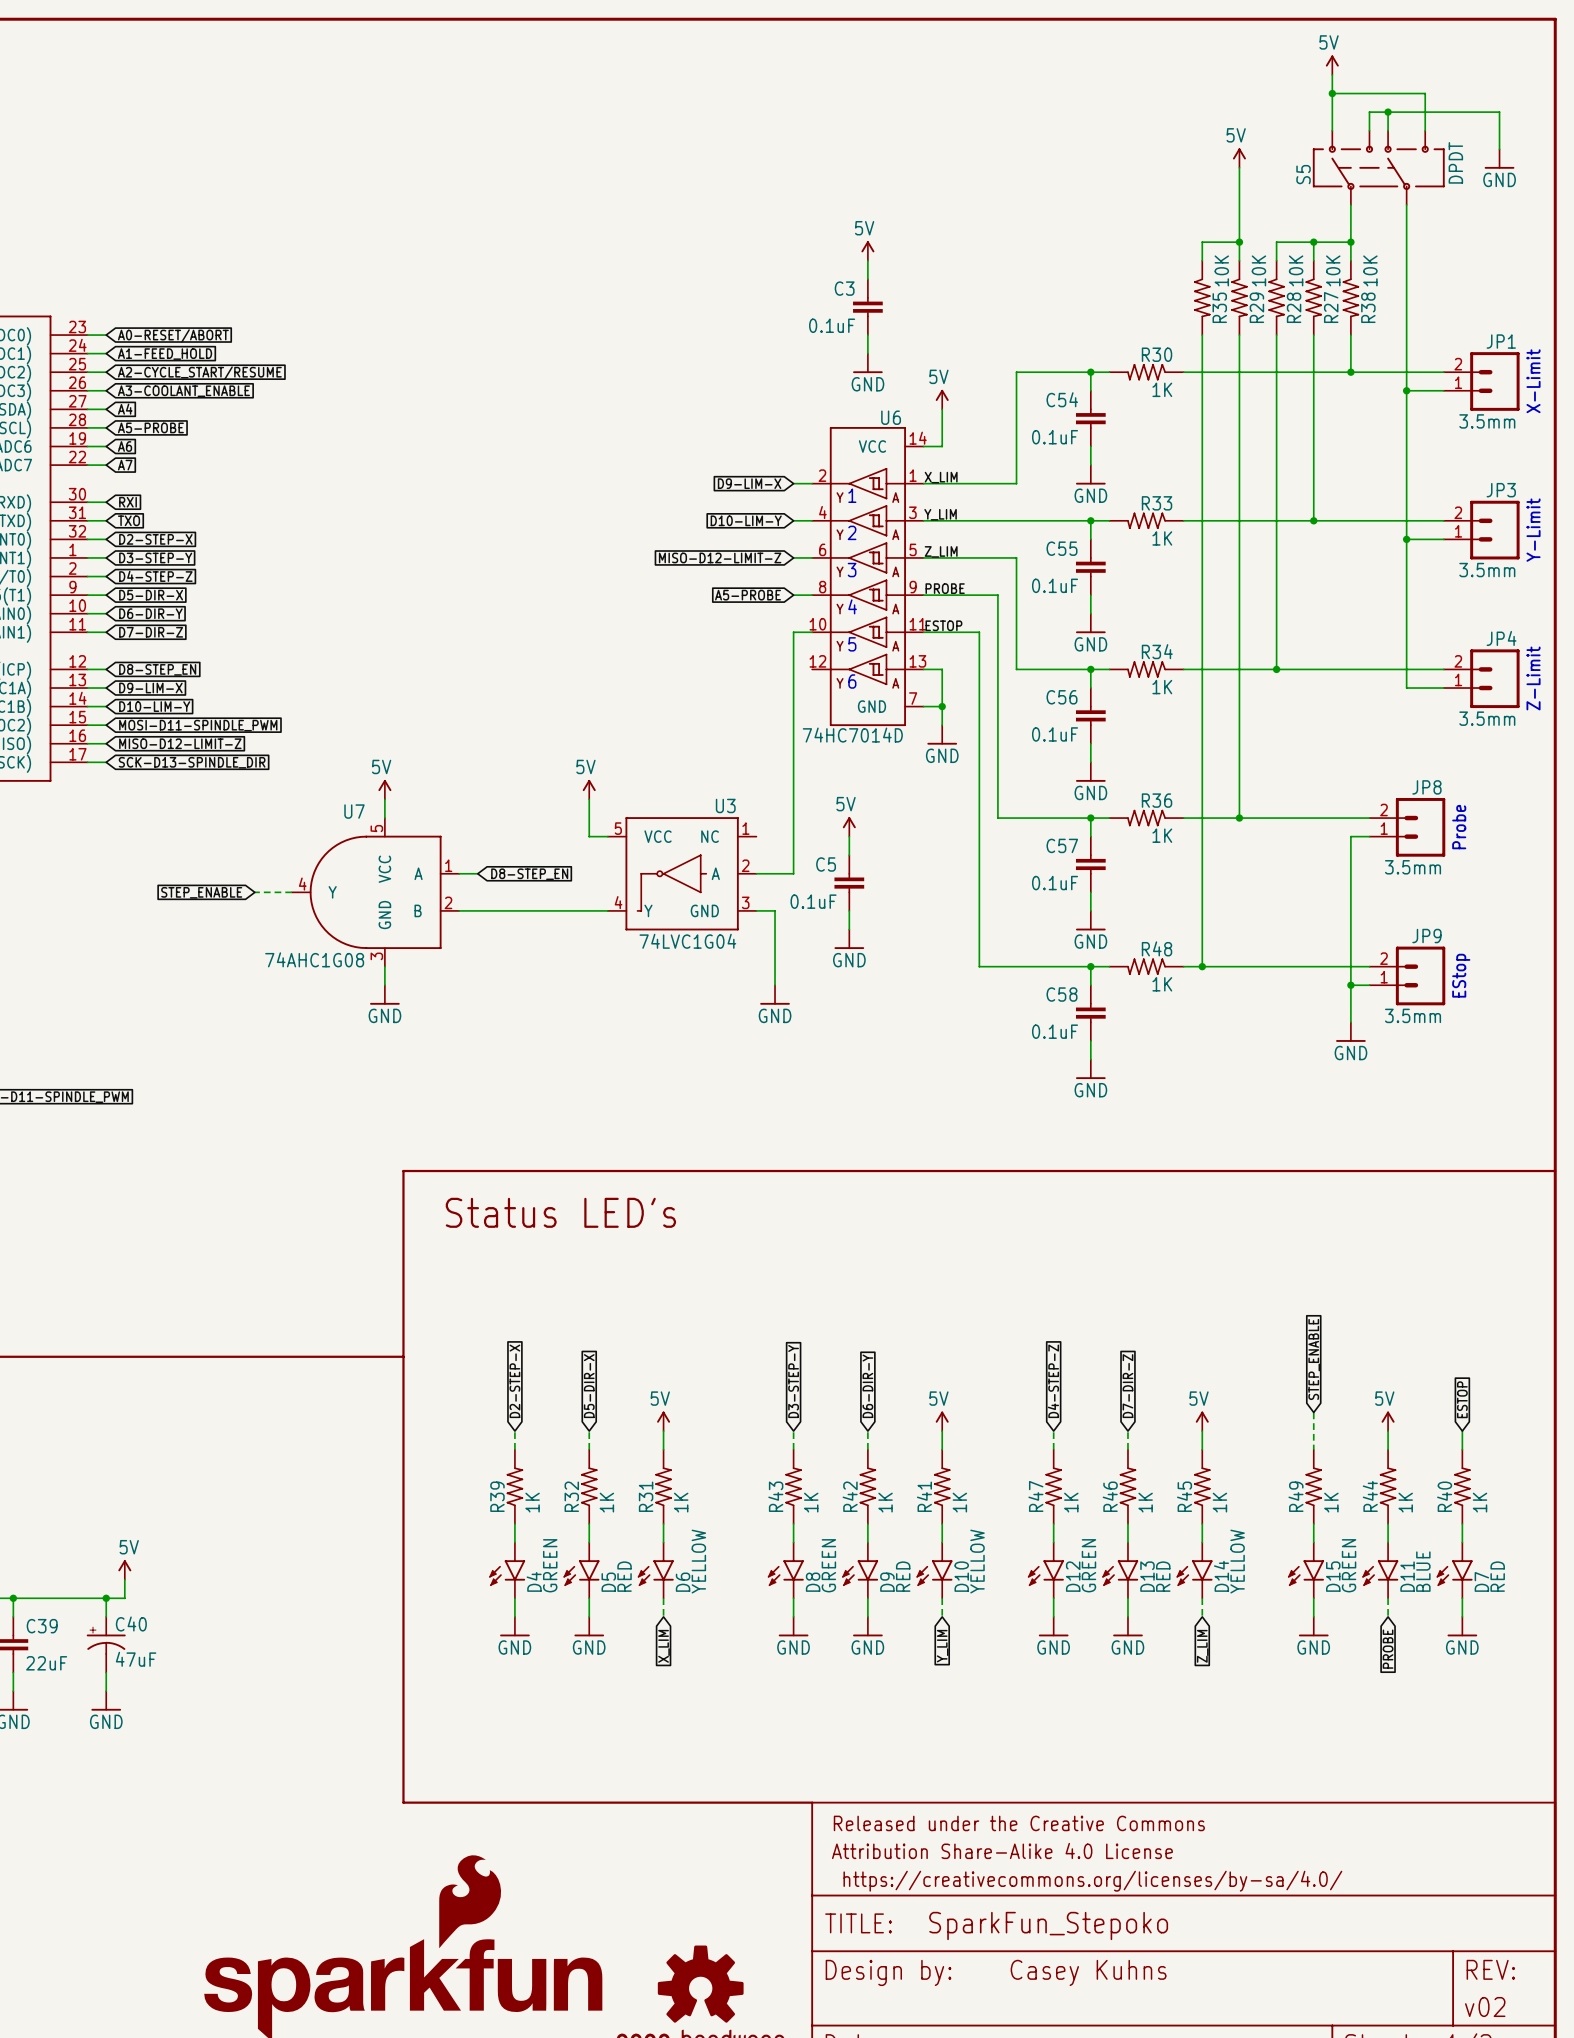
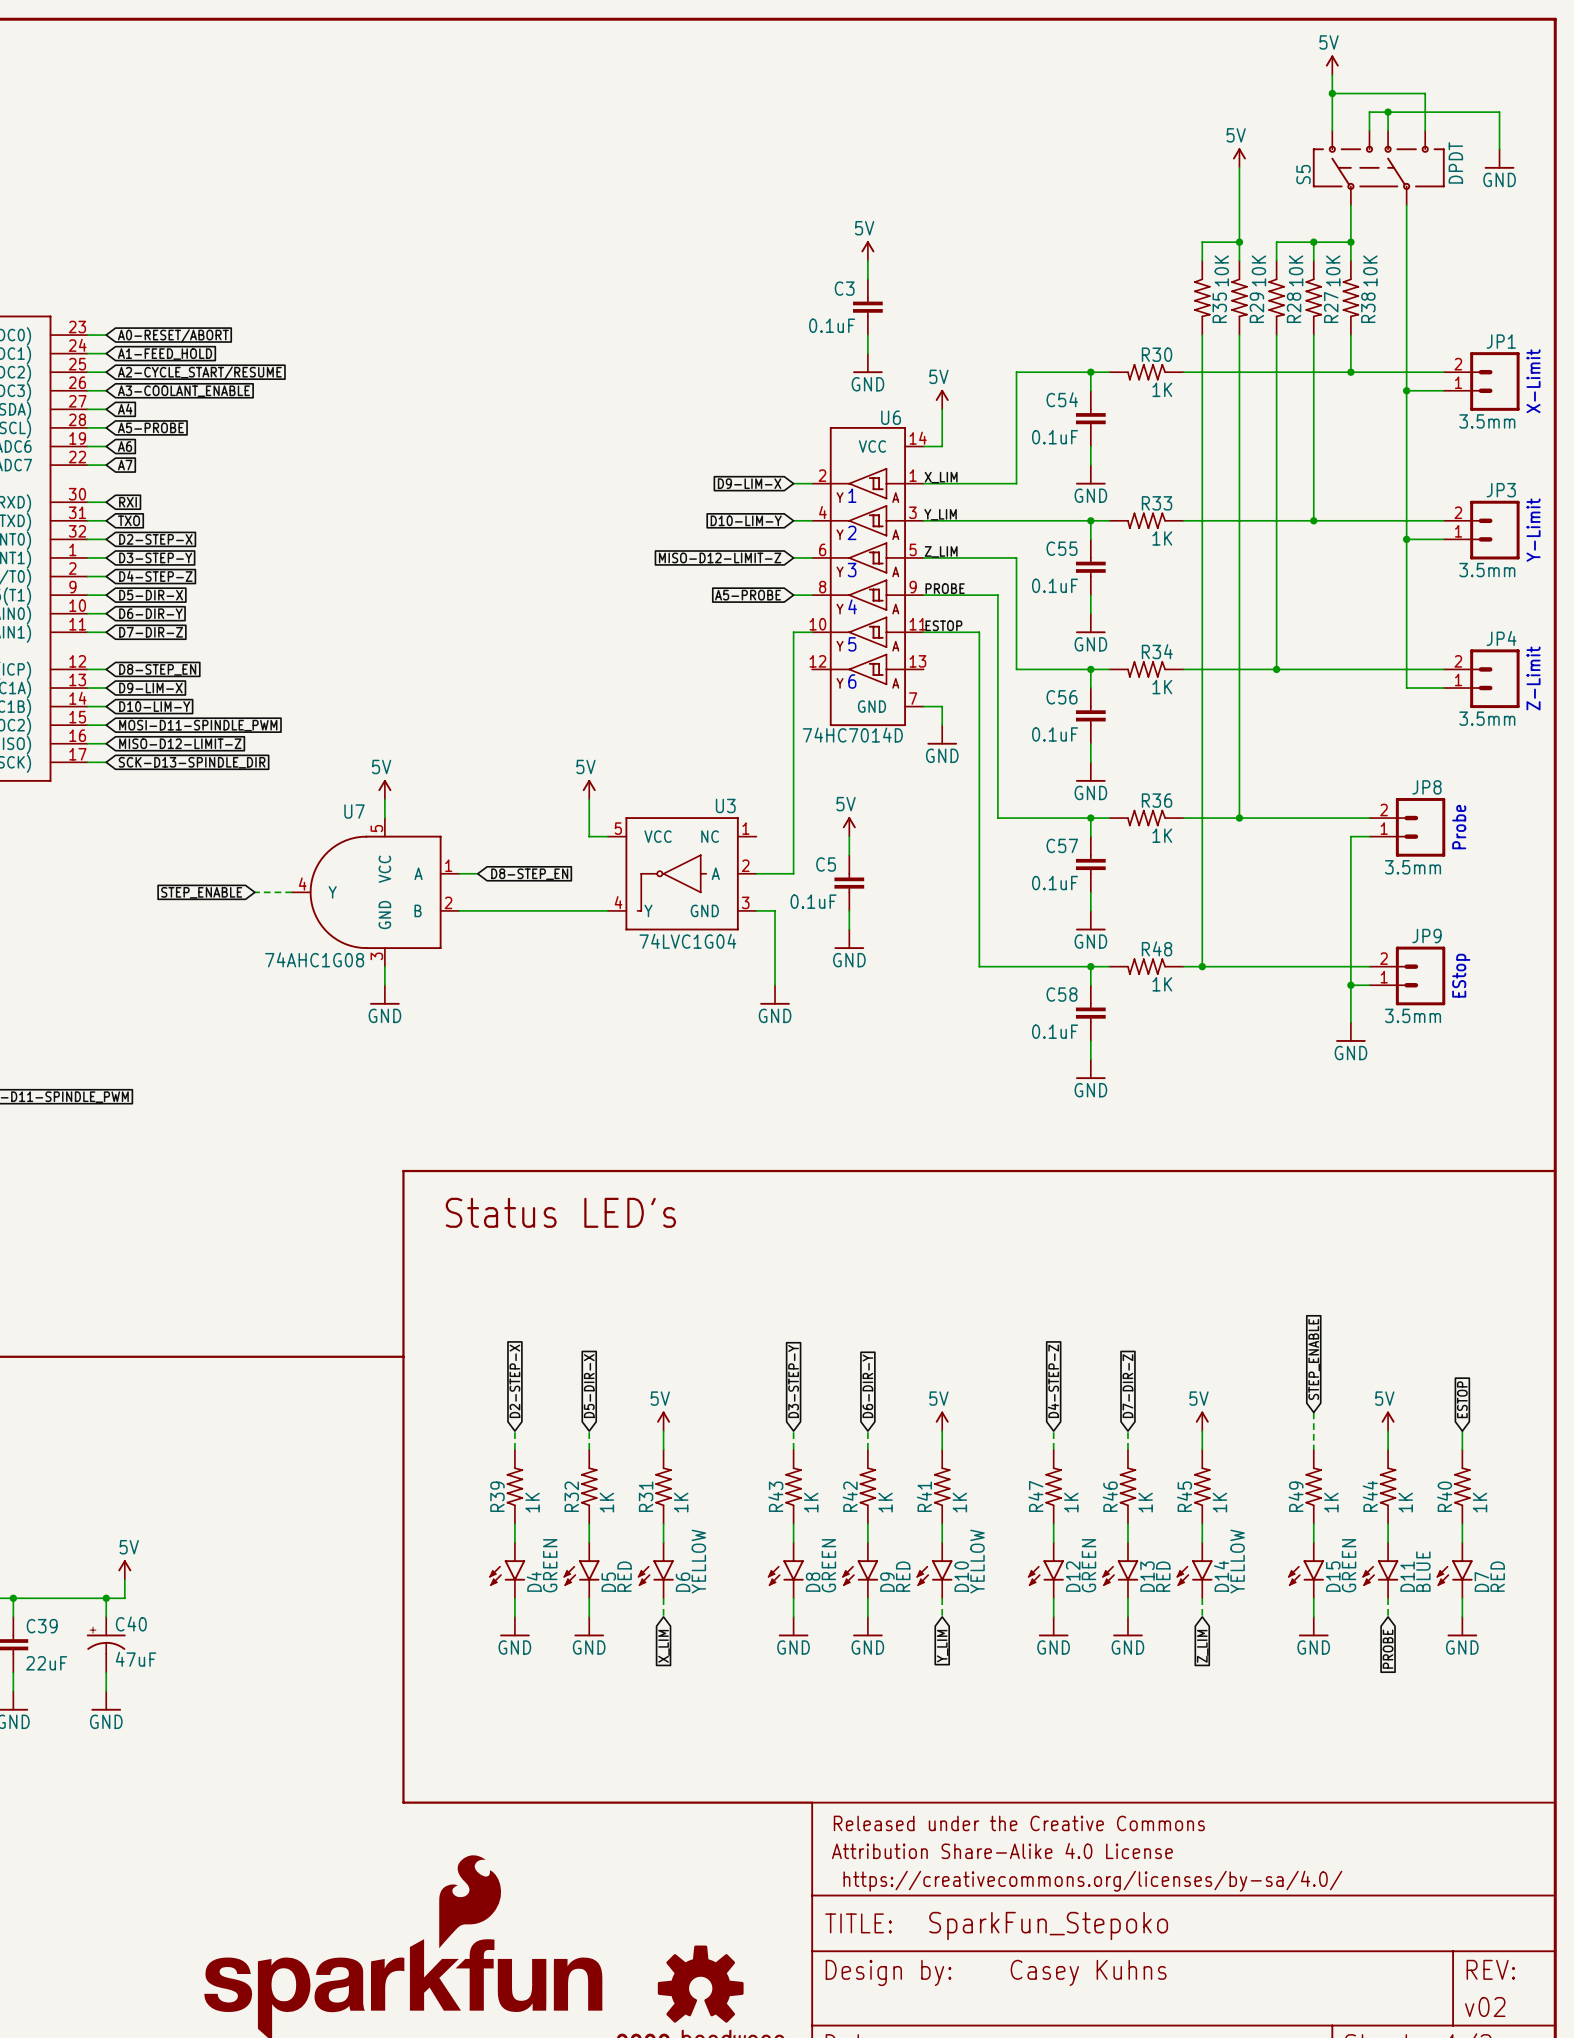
wire: (923, 669) (942, 669) (942, 706) -> none
junction: (942, 706) -> none

